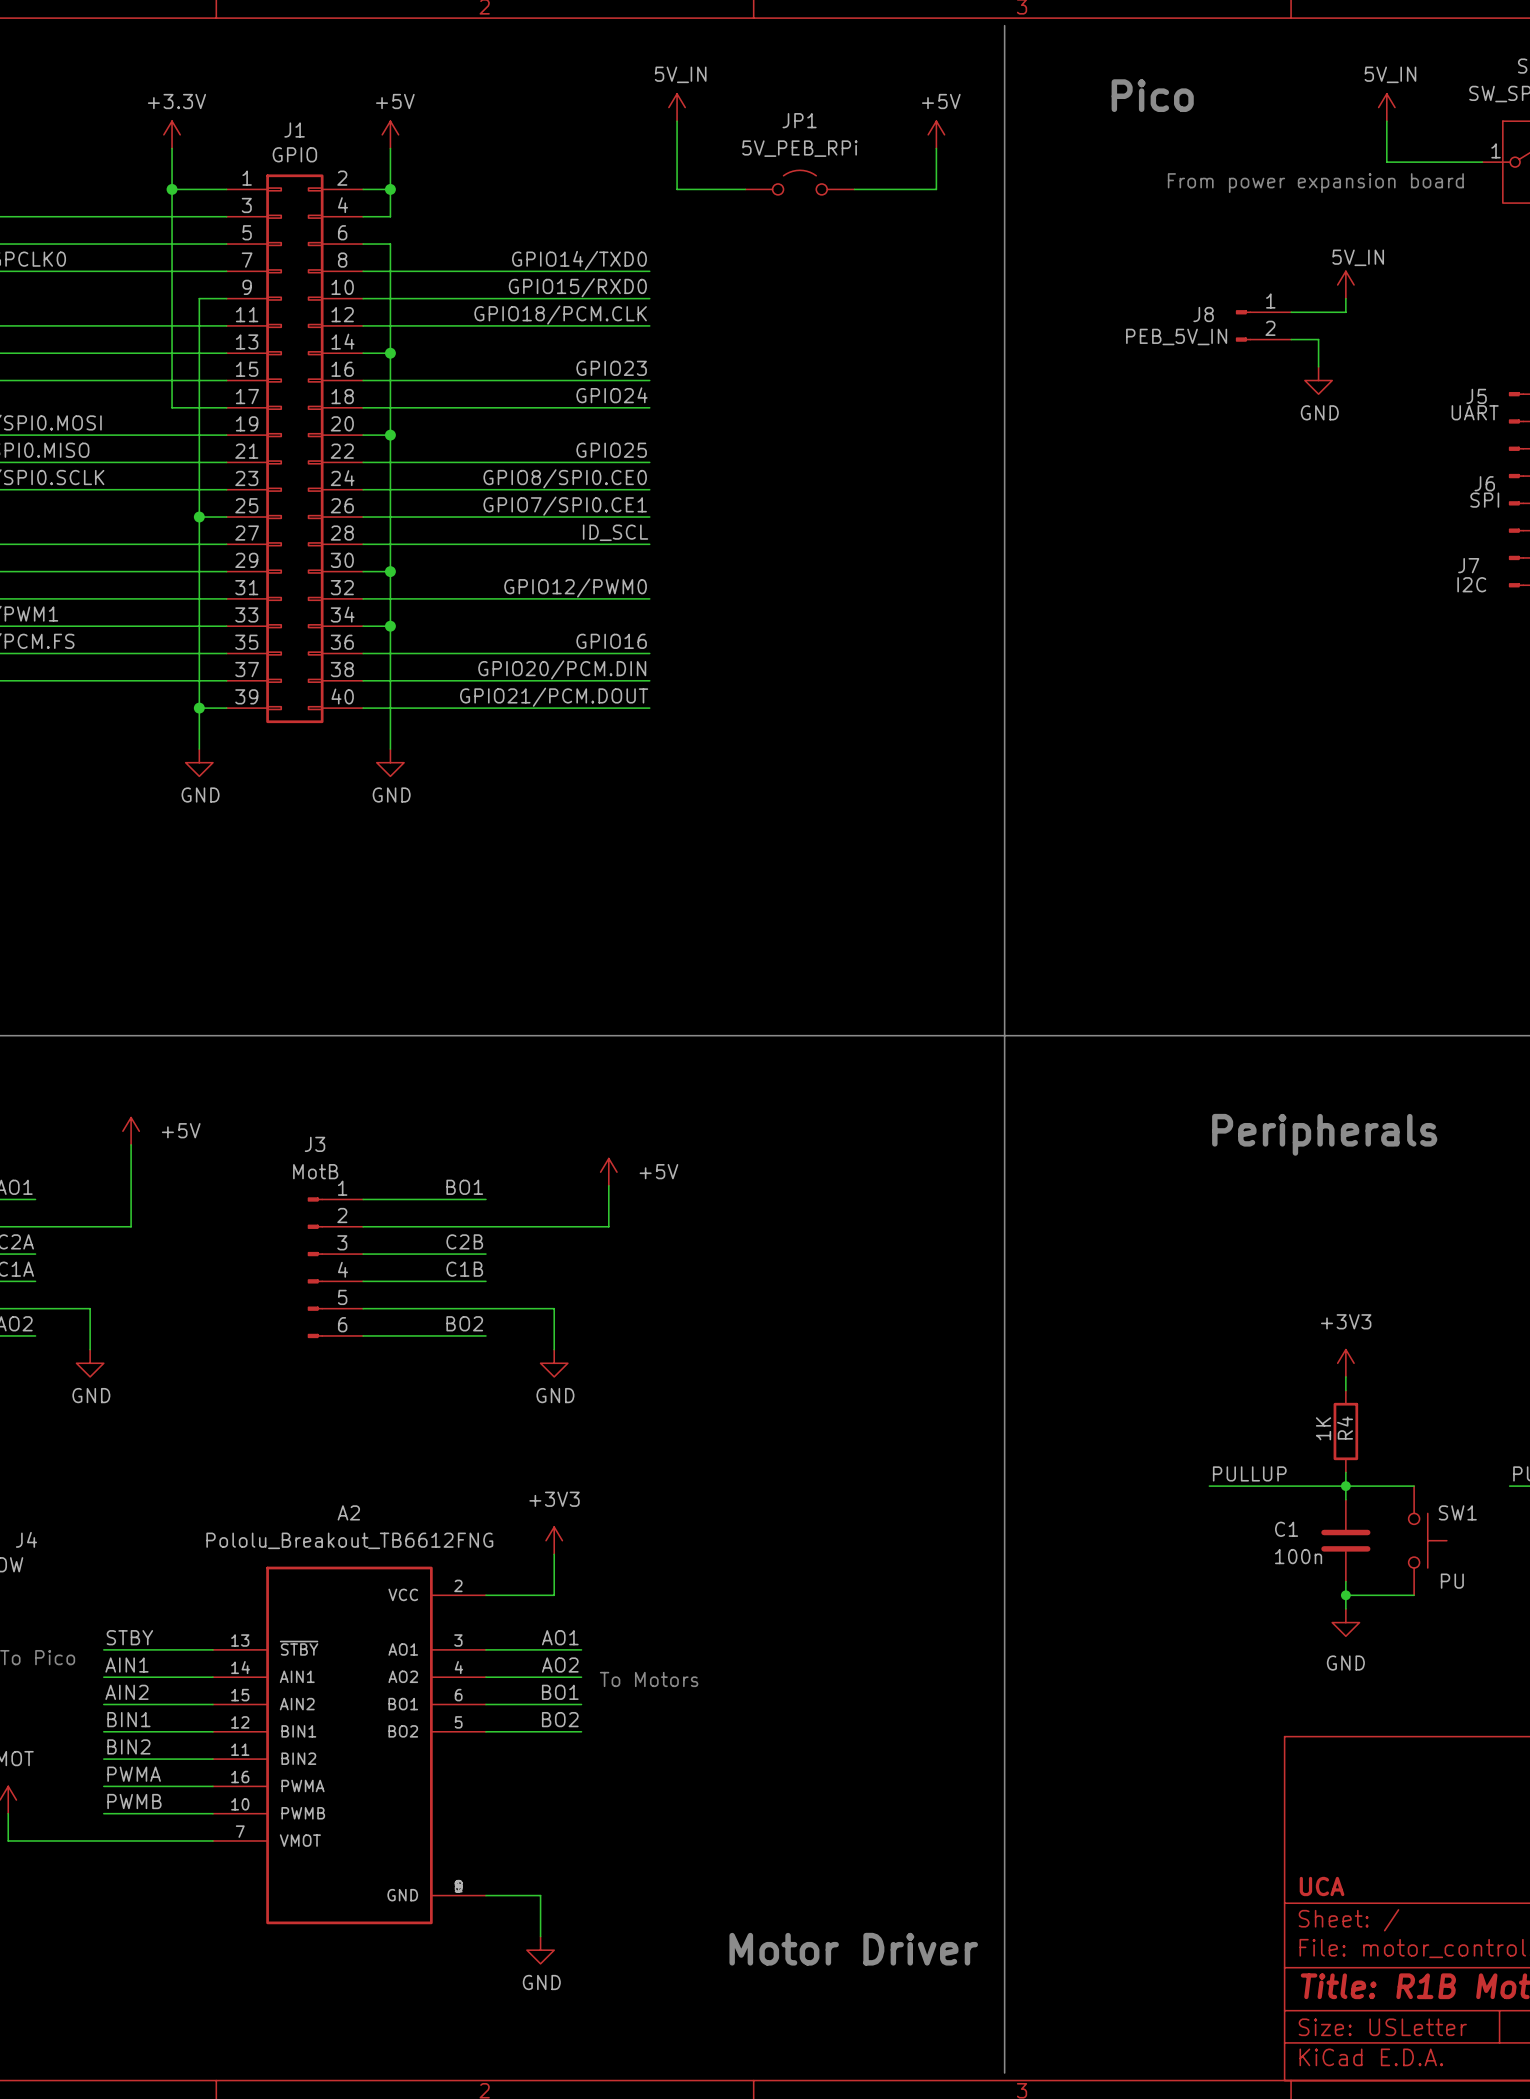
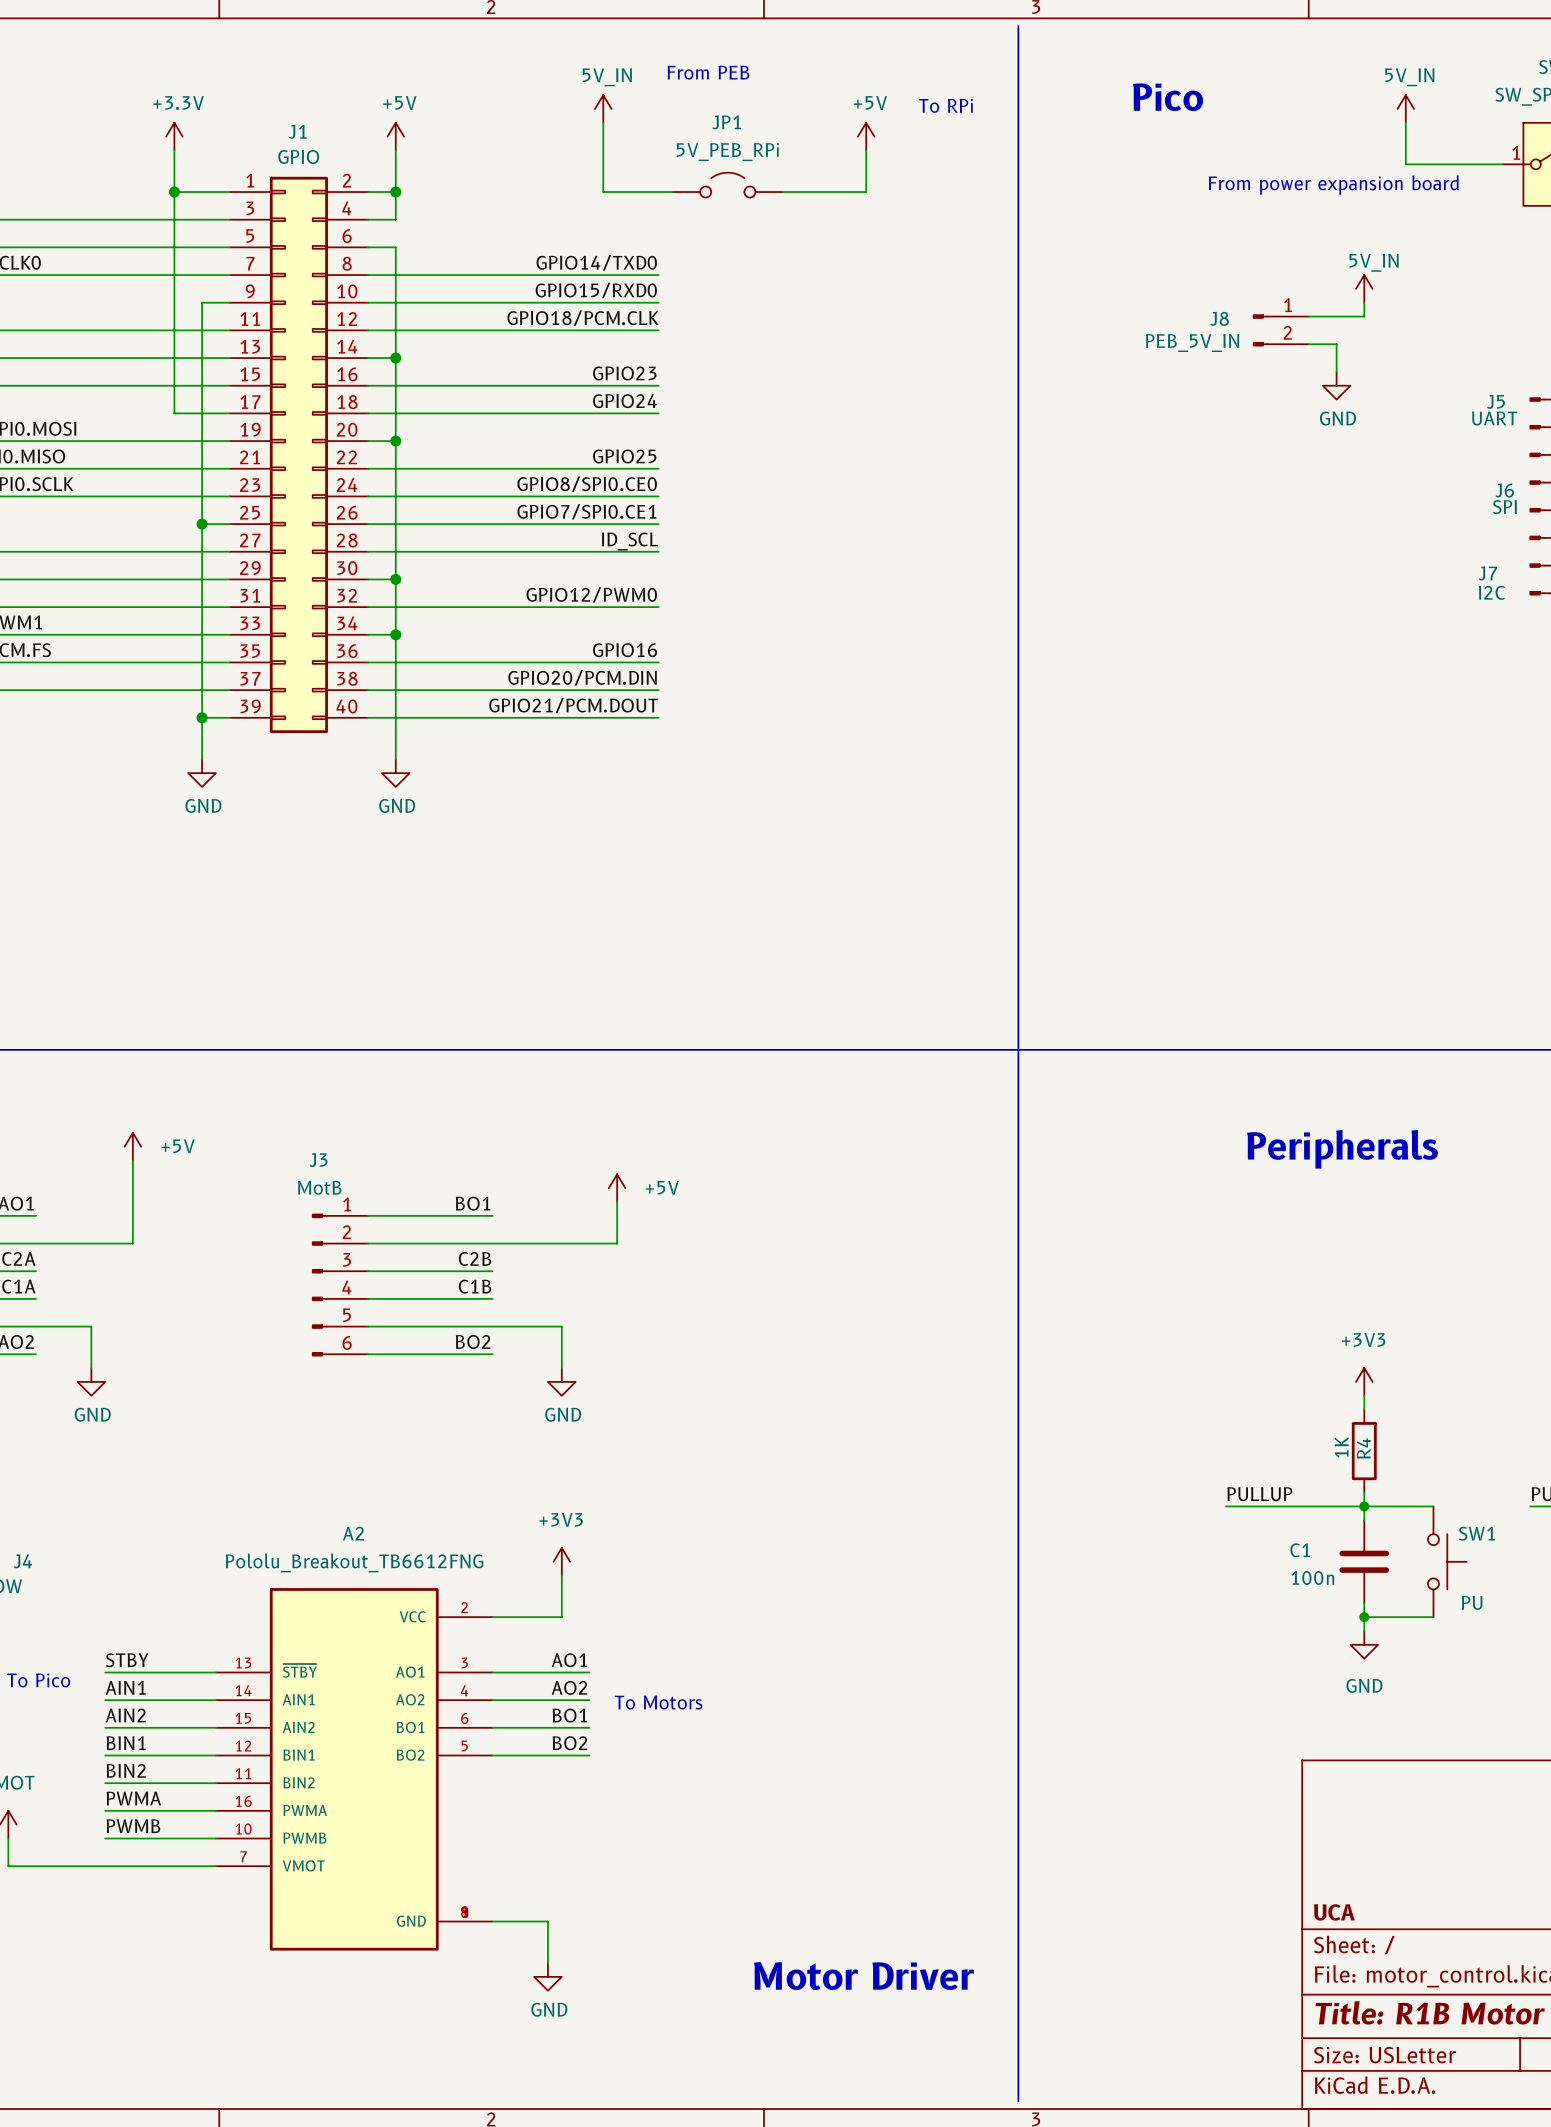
text: none -> From PEB (708, 72)
text: none -> To RPi (945, 105)
power symbol position: 5V_IN (677, 107) -> 5V_IN (603, 109)
wire: (677, 121) (677, 189) (745, 189) -> (603, 122) (603, 192) (672, 192)
power symbol position: +5V (936, 134) -> +5V (866, 136)
wire: (936, 148) (936, 189) (854, 189) -> (866, 150) (866, 192) (783, 192)
JP1 position: (799, 182) -> (727, 185)

